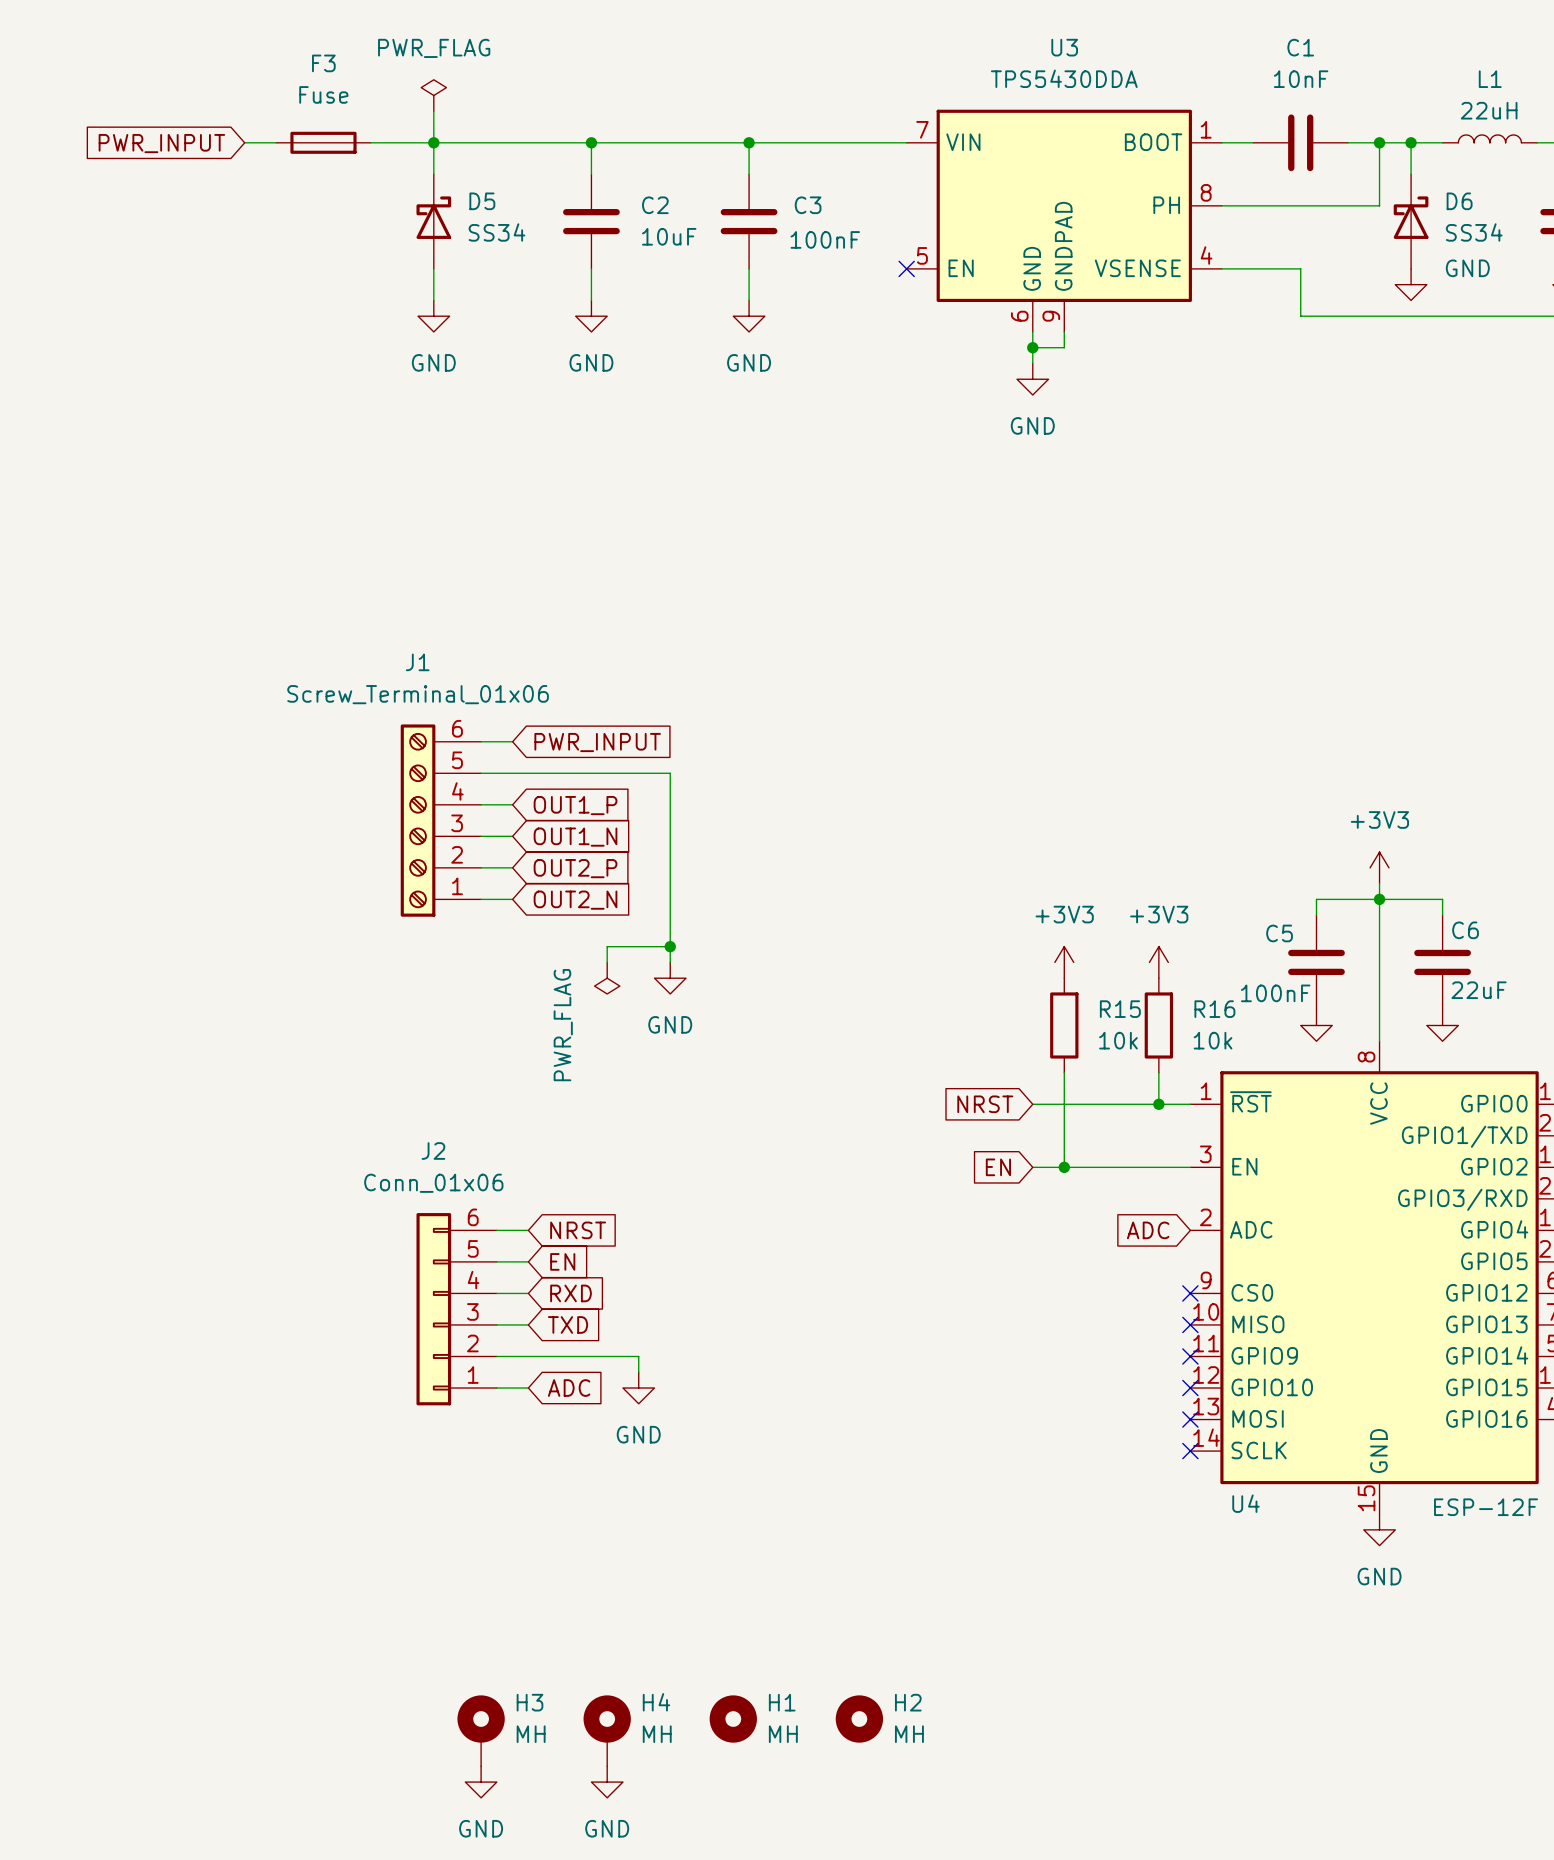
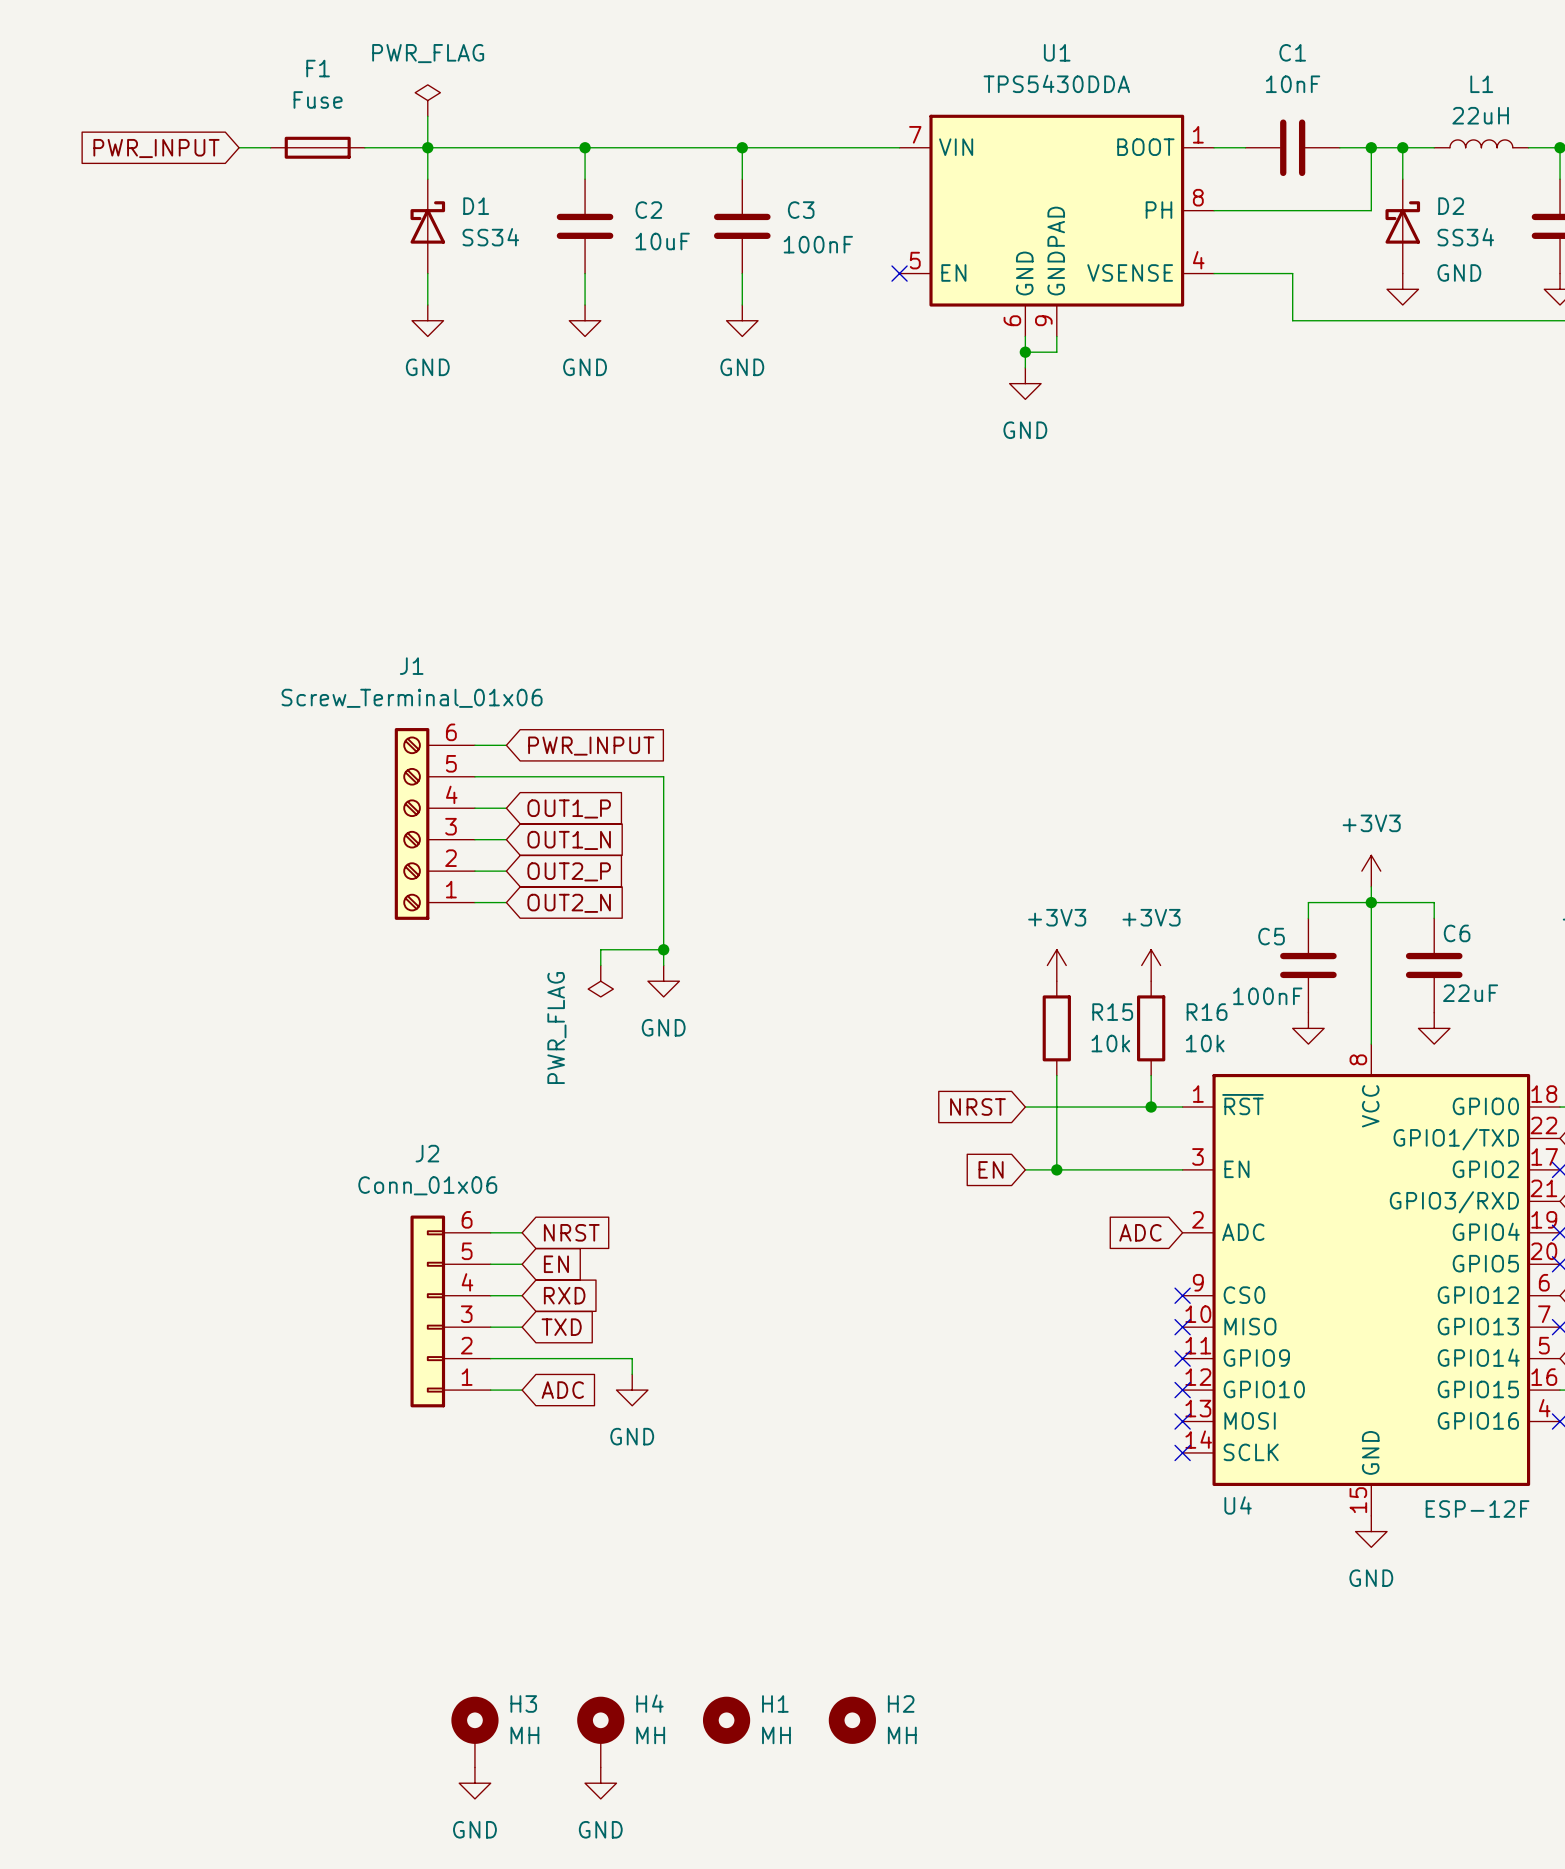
U3 name: U3 (1064, 47) -> U1 (1057, 52)
F3 name: F3 (323, 63) -> F1 (318, 68)
D5 name: D5 (482, 201) -> D1 (476, 206)
D6 name: D6 (1459, 201) -> D2 (1451, 206)

